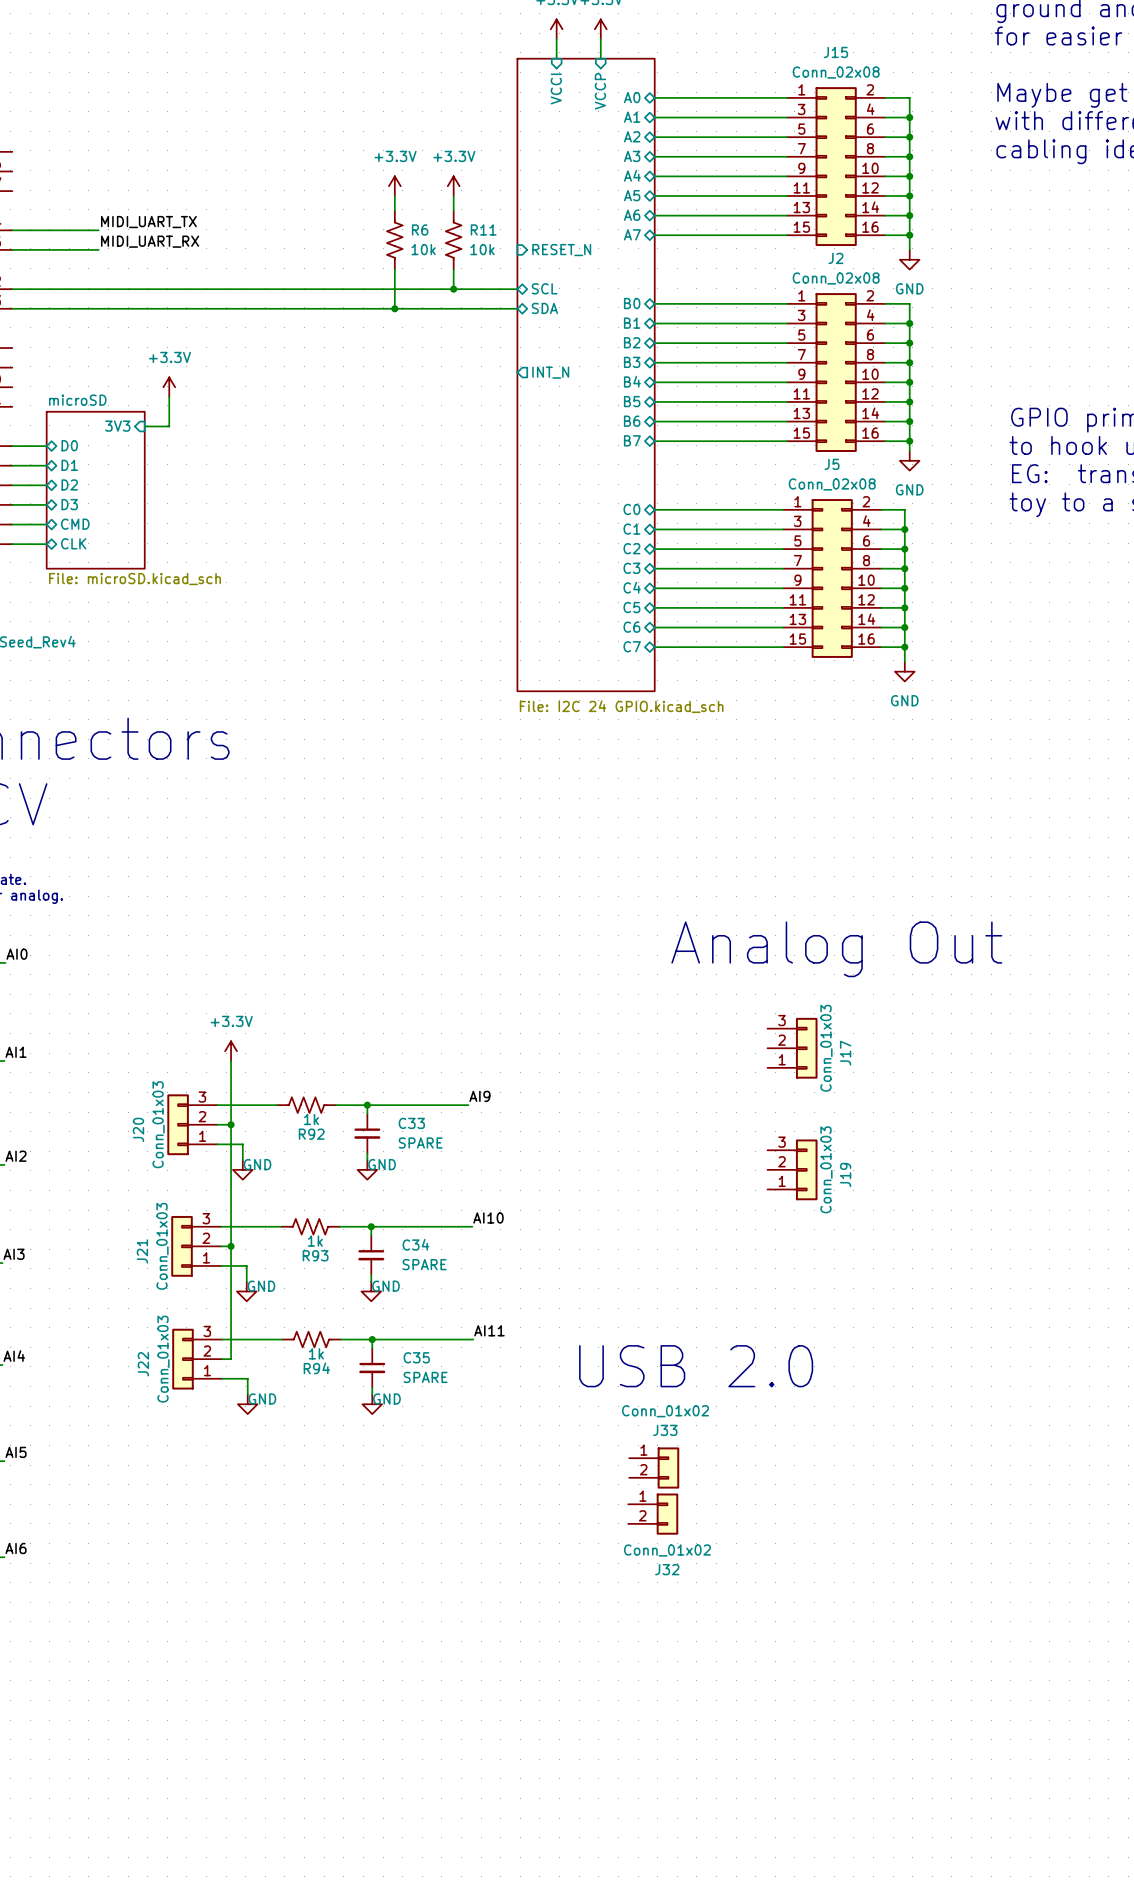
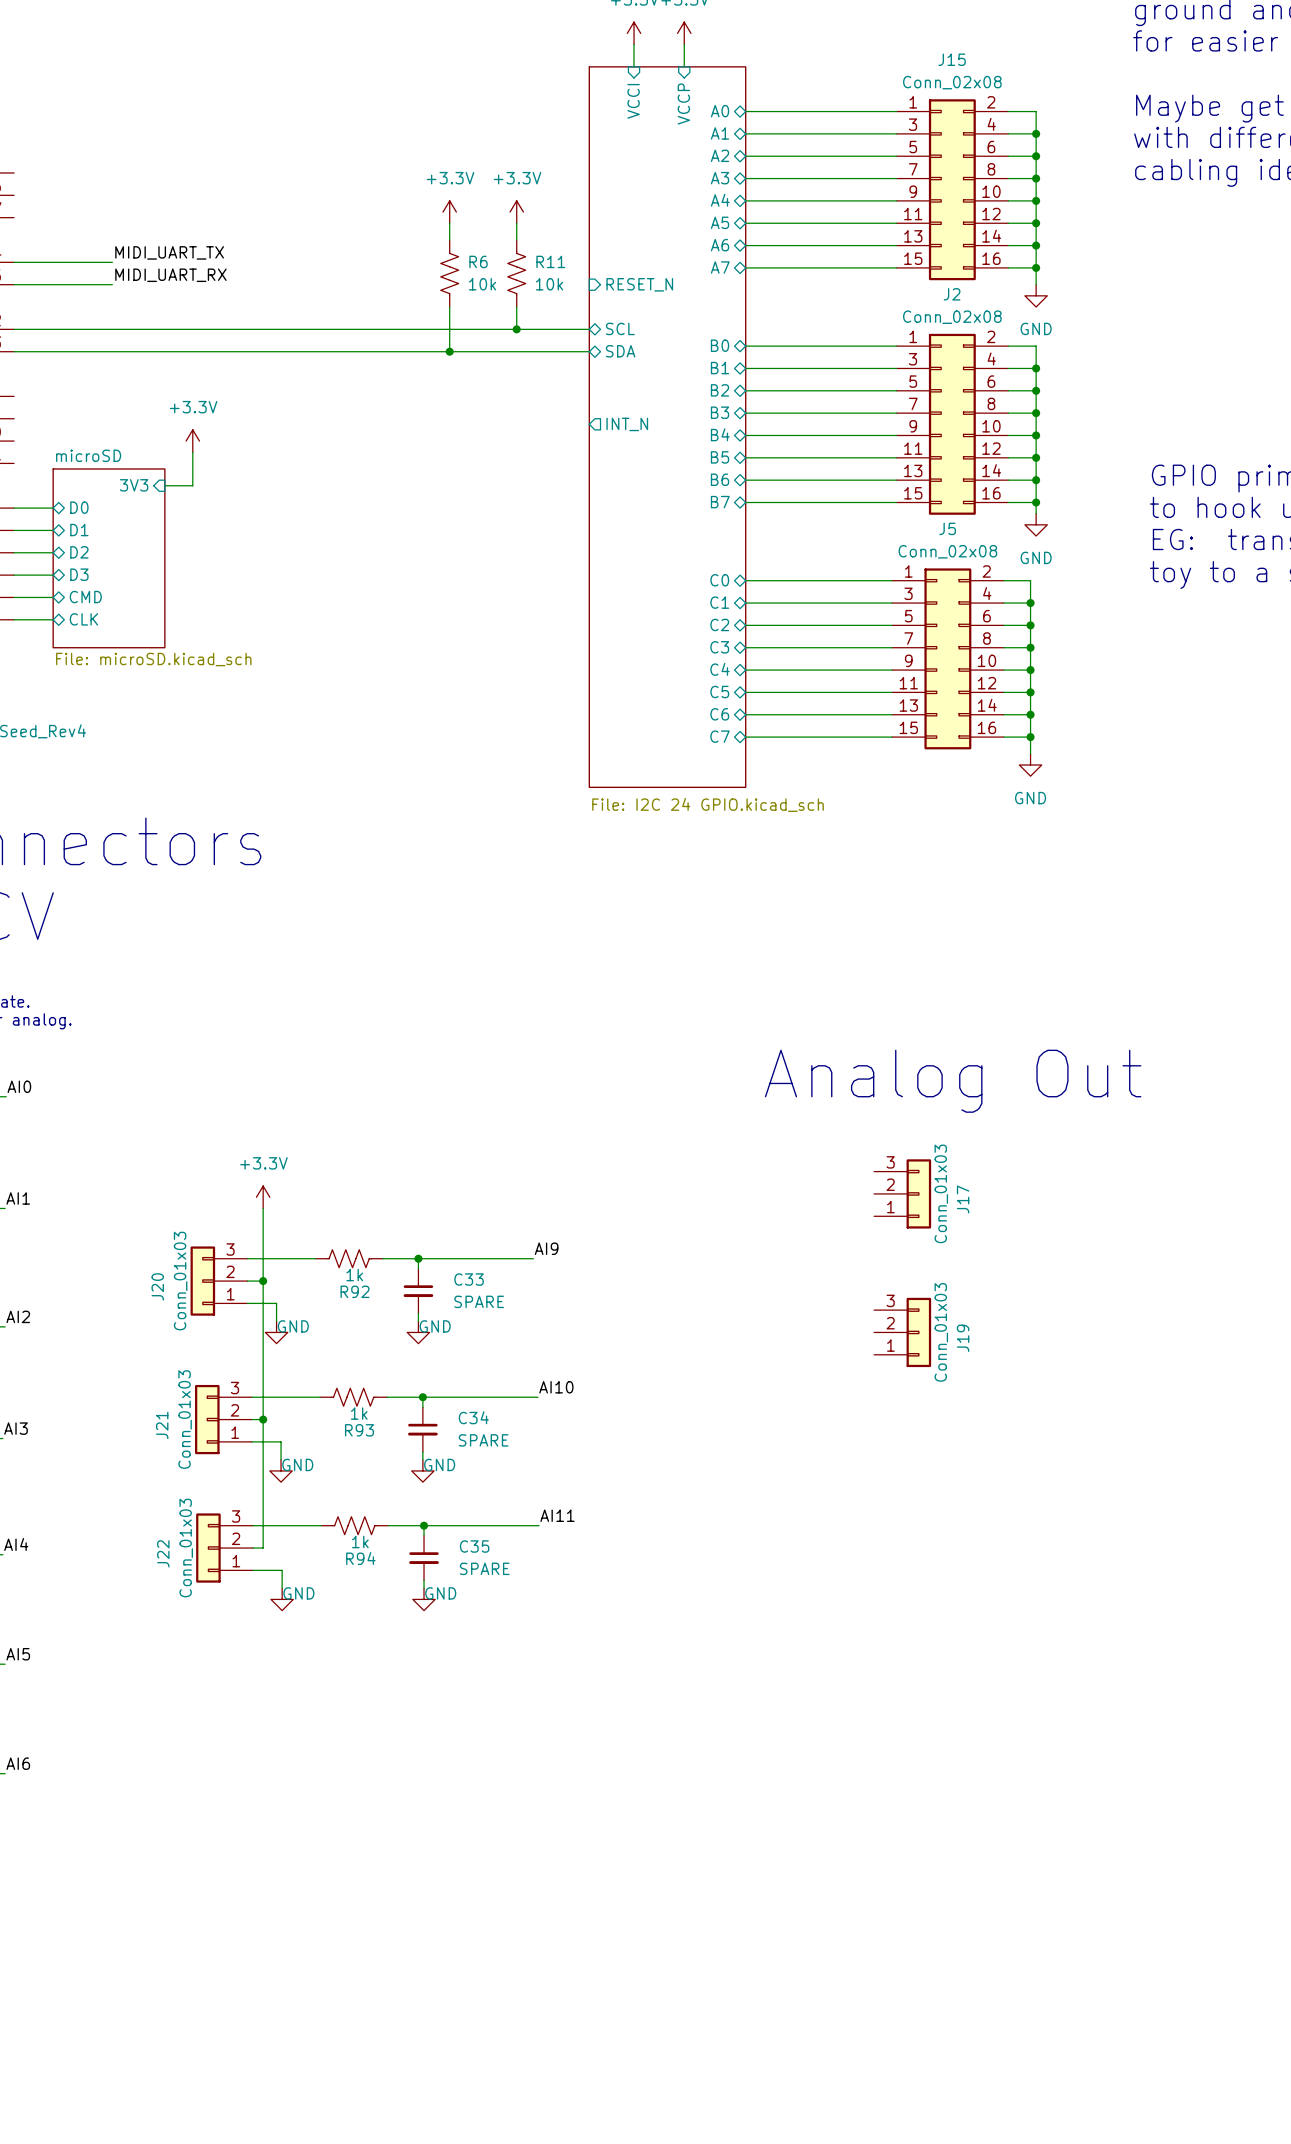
text: USB 2.0 (696, 1366) -> none
J33: Conn_01x02 (654, 1468) -> none
J32: Conn_01x02 (653, 1514) -> none

